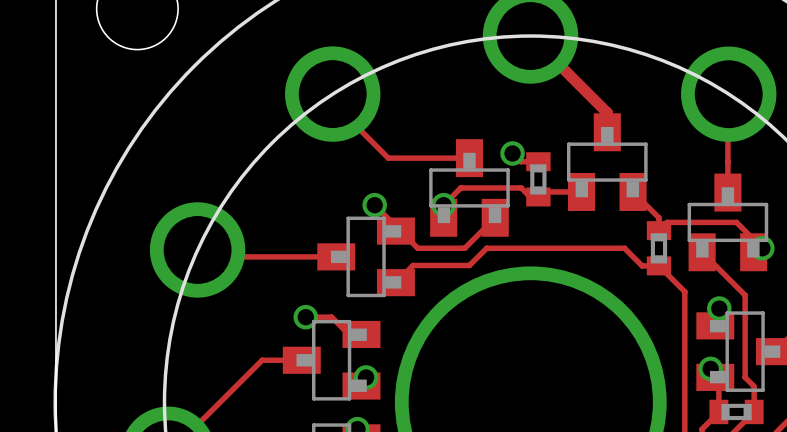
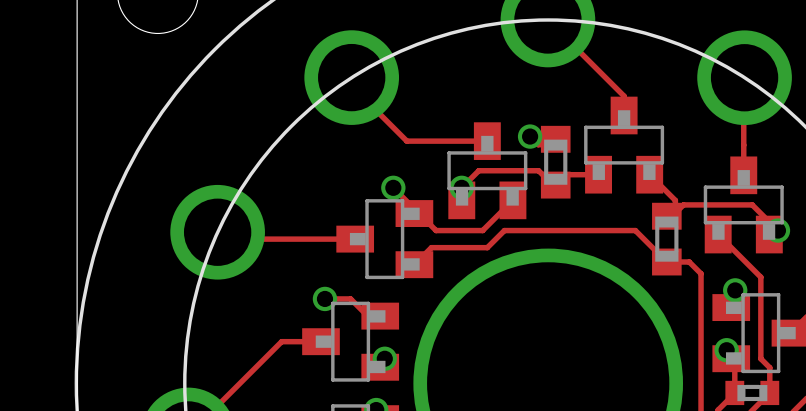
track width: thick (530, 36) (607, 112) (607, 132) -> thin (547, 20) (624, 96) (624, 115)
part footprint: [526, 152, 551, 207] -> [540, 125, 571, 199]
part footprint: [646, 221, 672, 276] -> [652, 202, 682, 276]
track: (618, 248) (624, 248) (642, 265) (658, 265) (673, 279) -> (635, 230) (666, 262) (689, 262)

